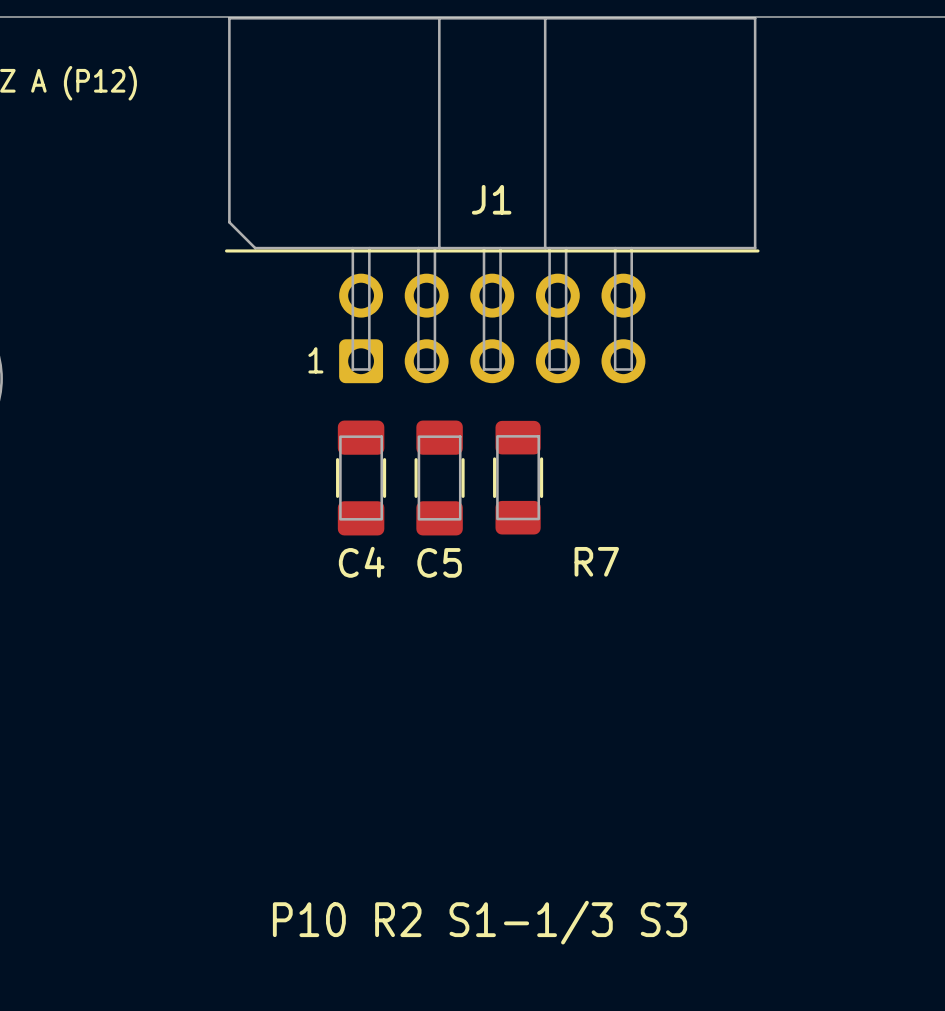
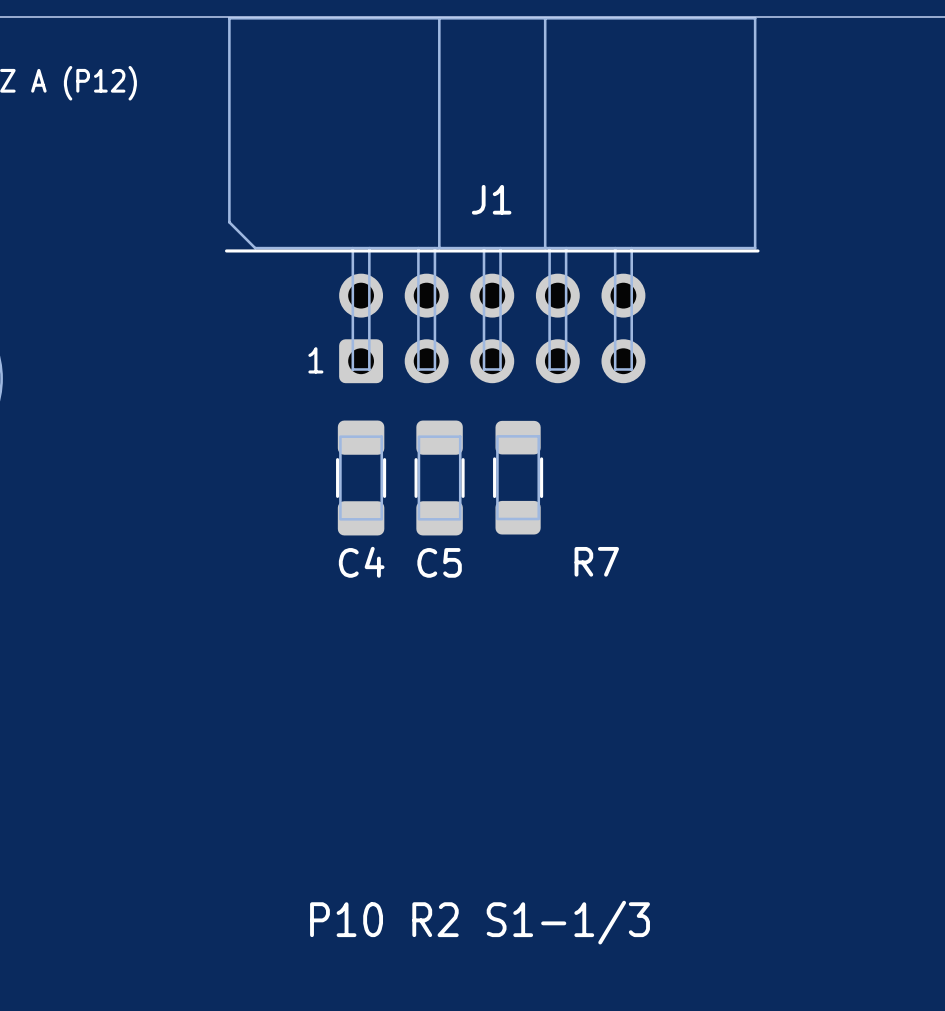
text: P10 R2 S1-1/3 S3 (480, 922) -> P10 R2 S1-1/3 (480, 922)

